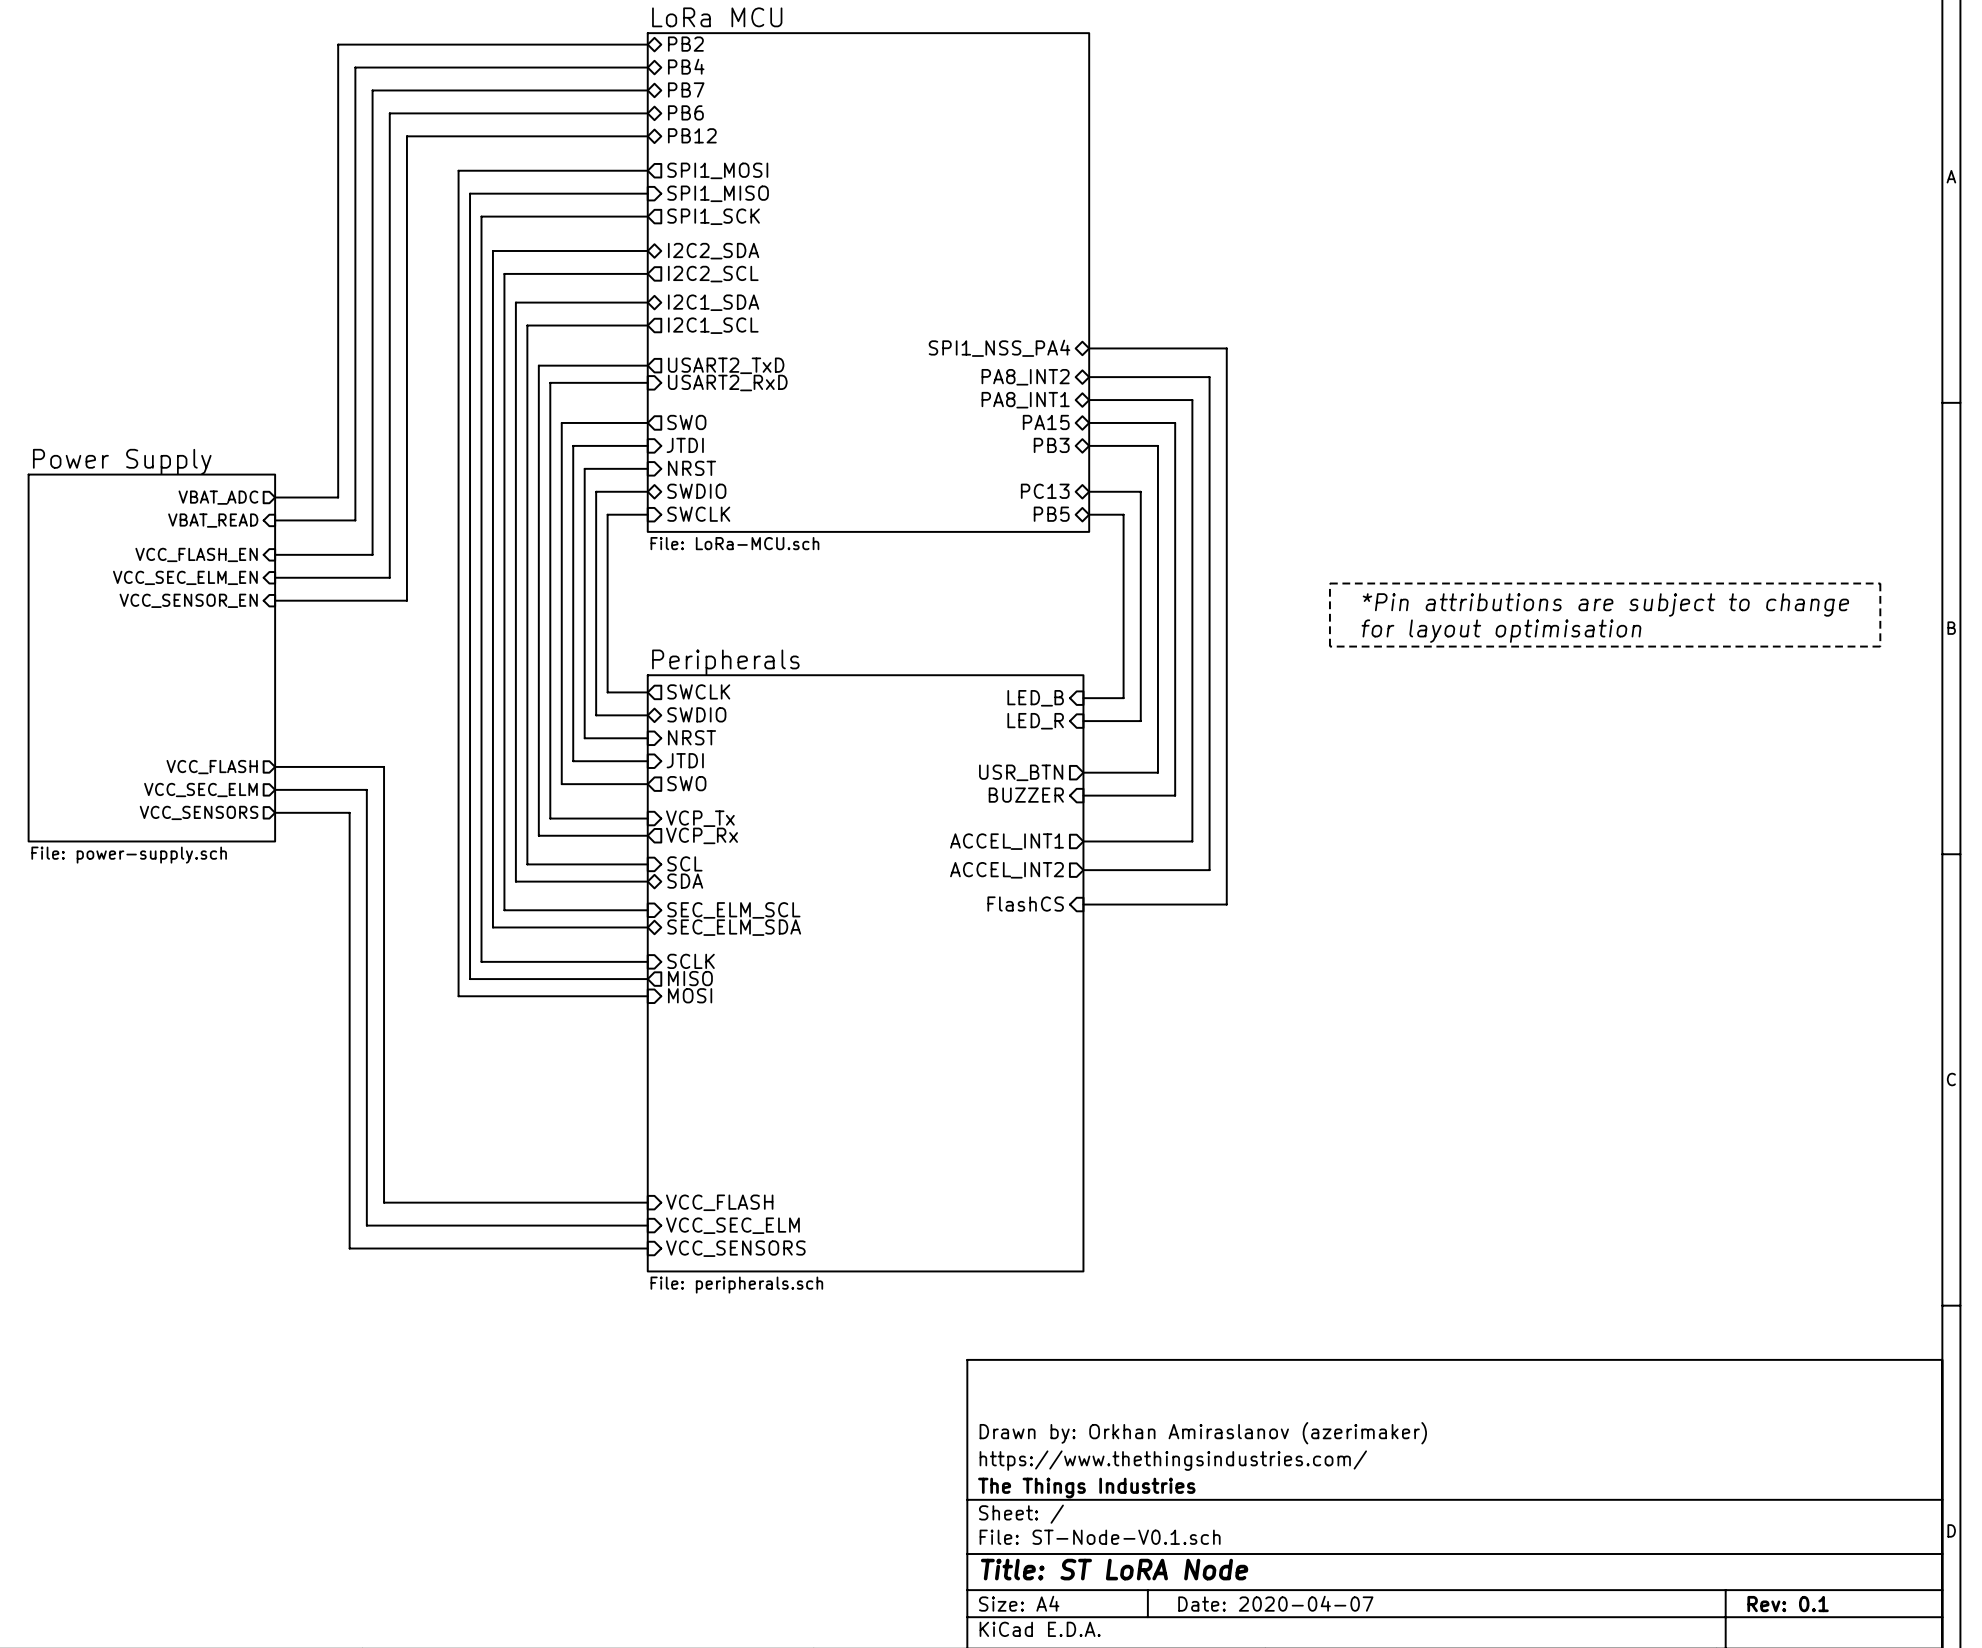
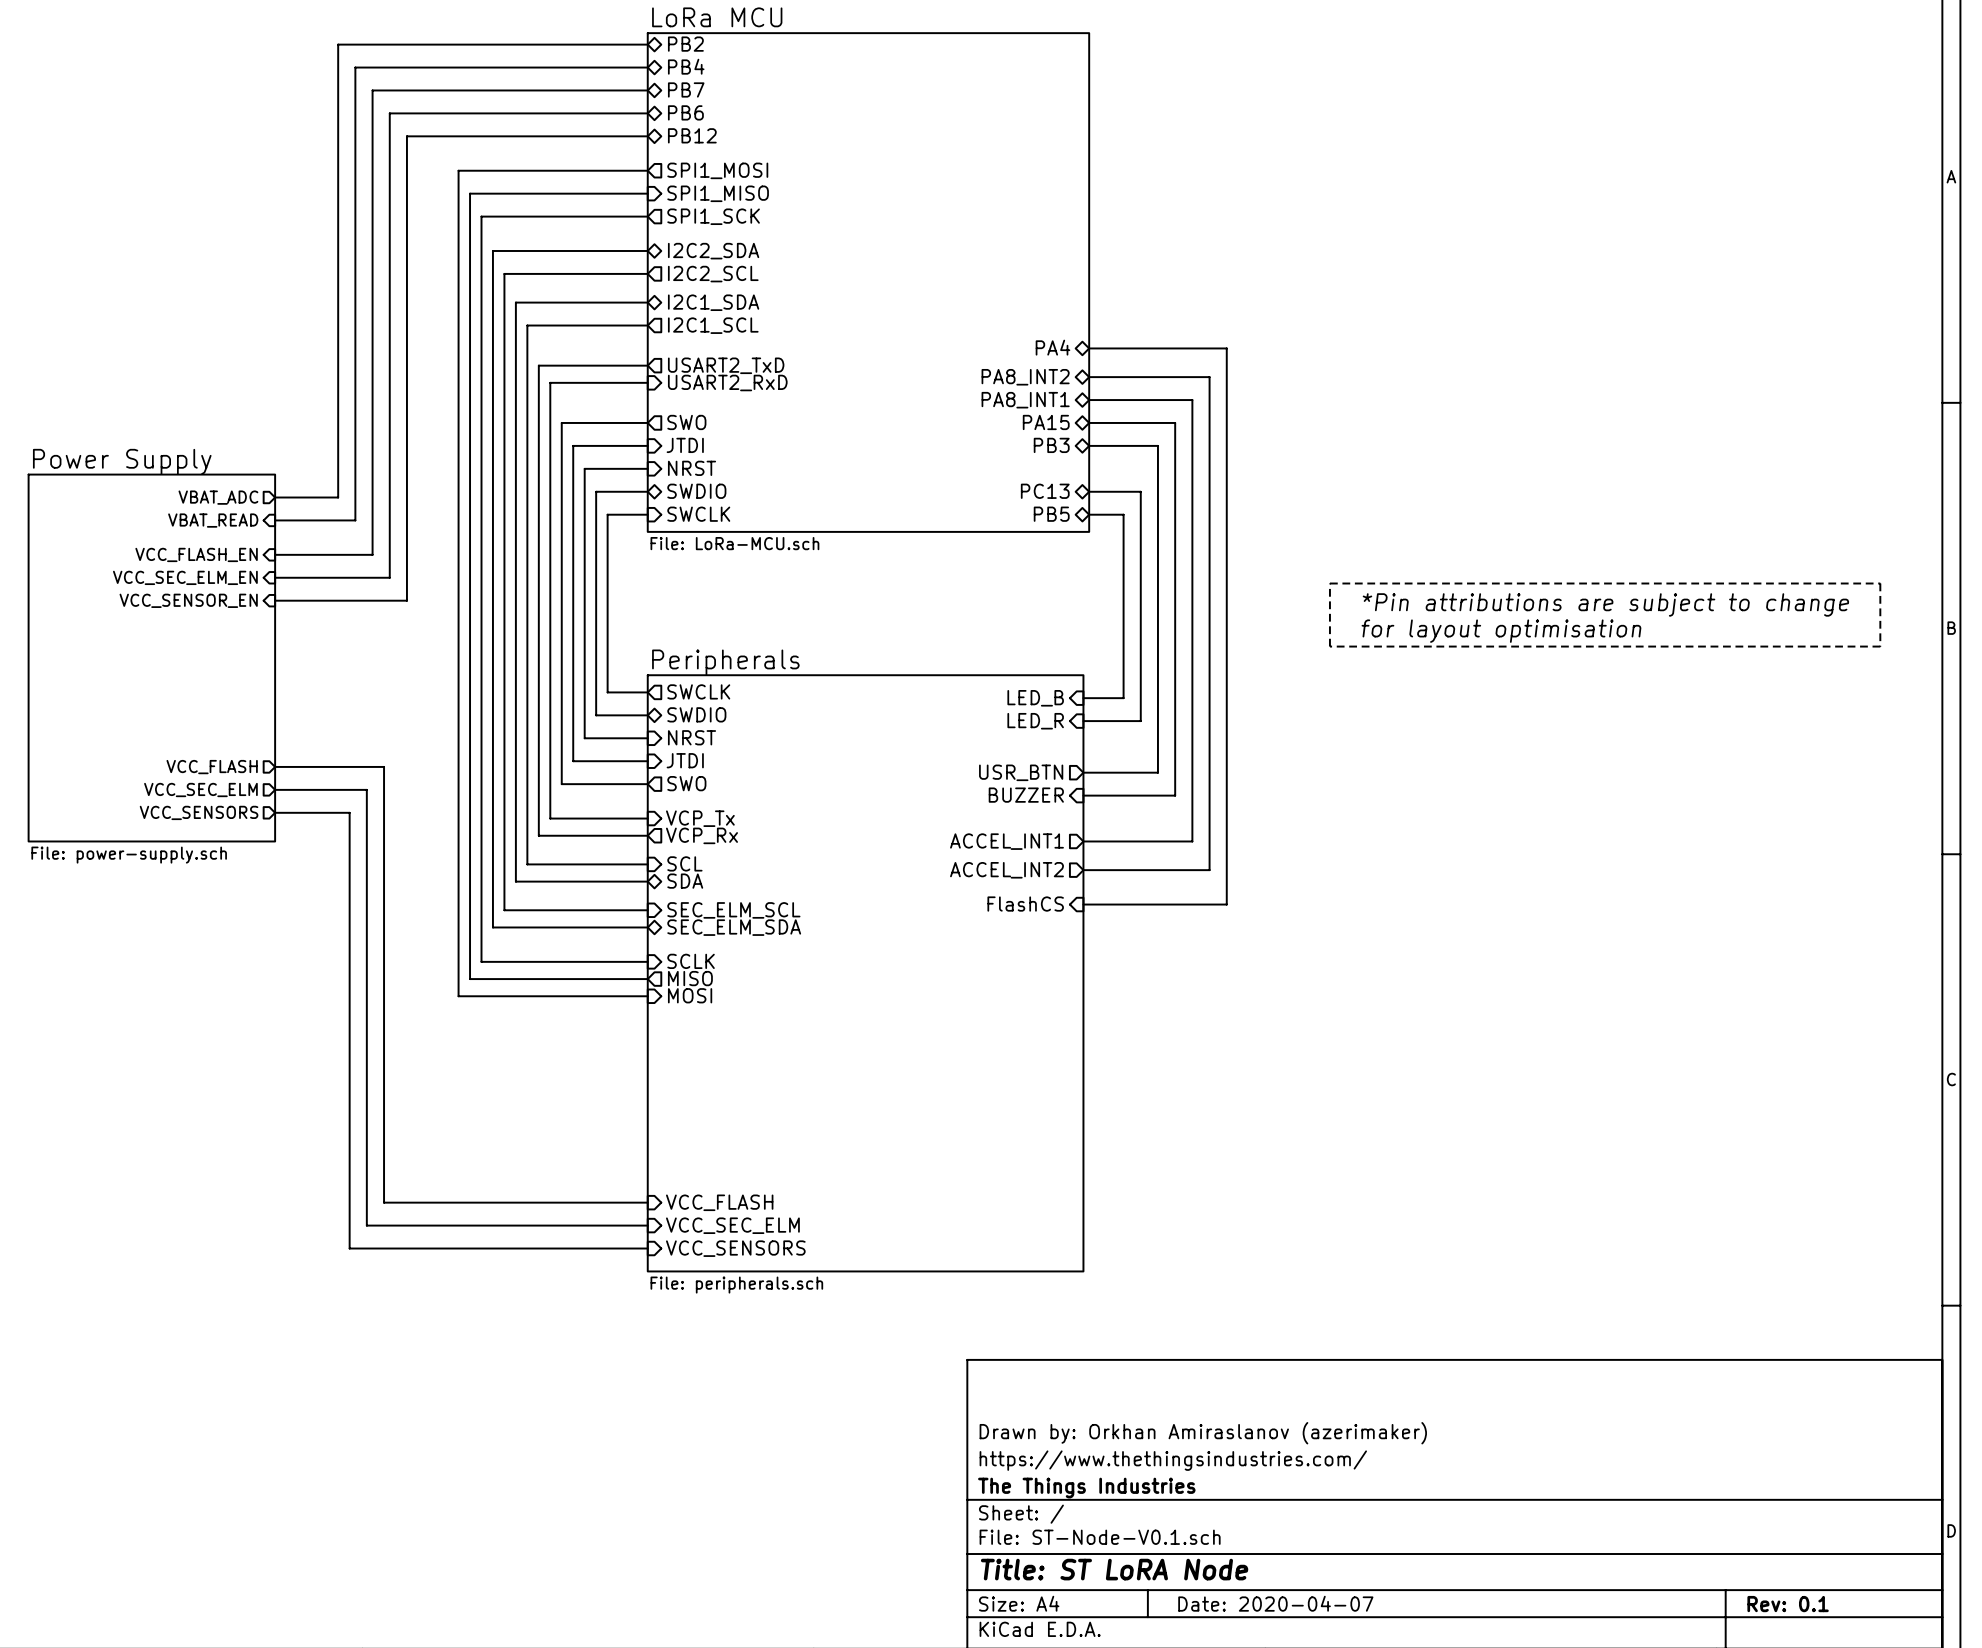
sheet pin: SPI1_NSS_PA4 (999, 348) -> PA4 (1052, 347)

